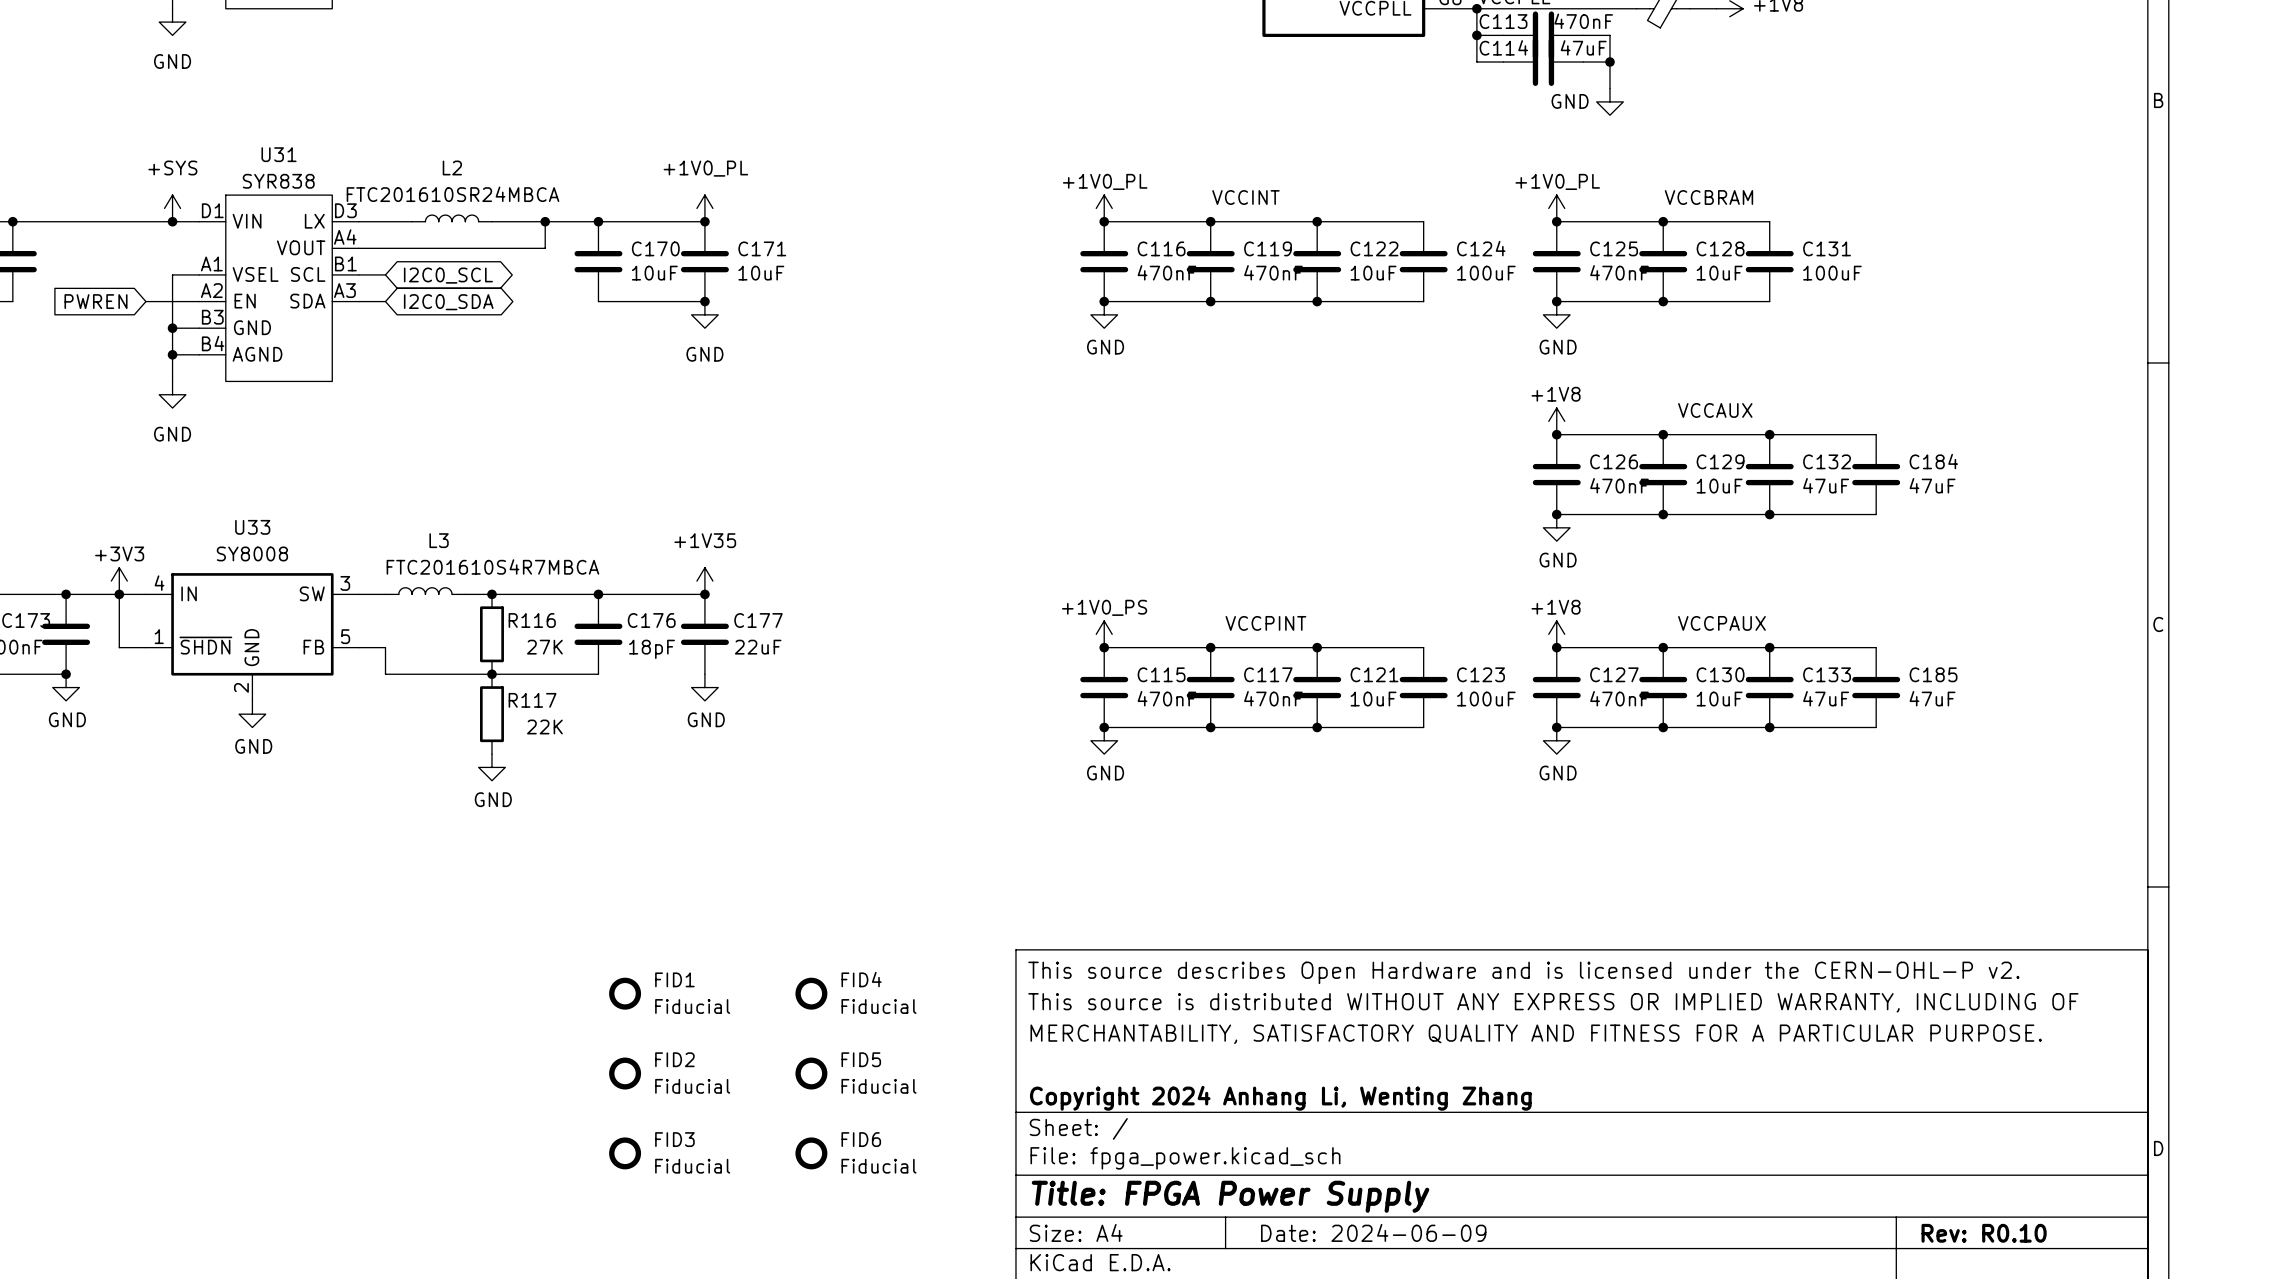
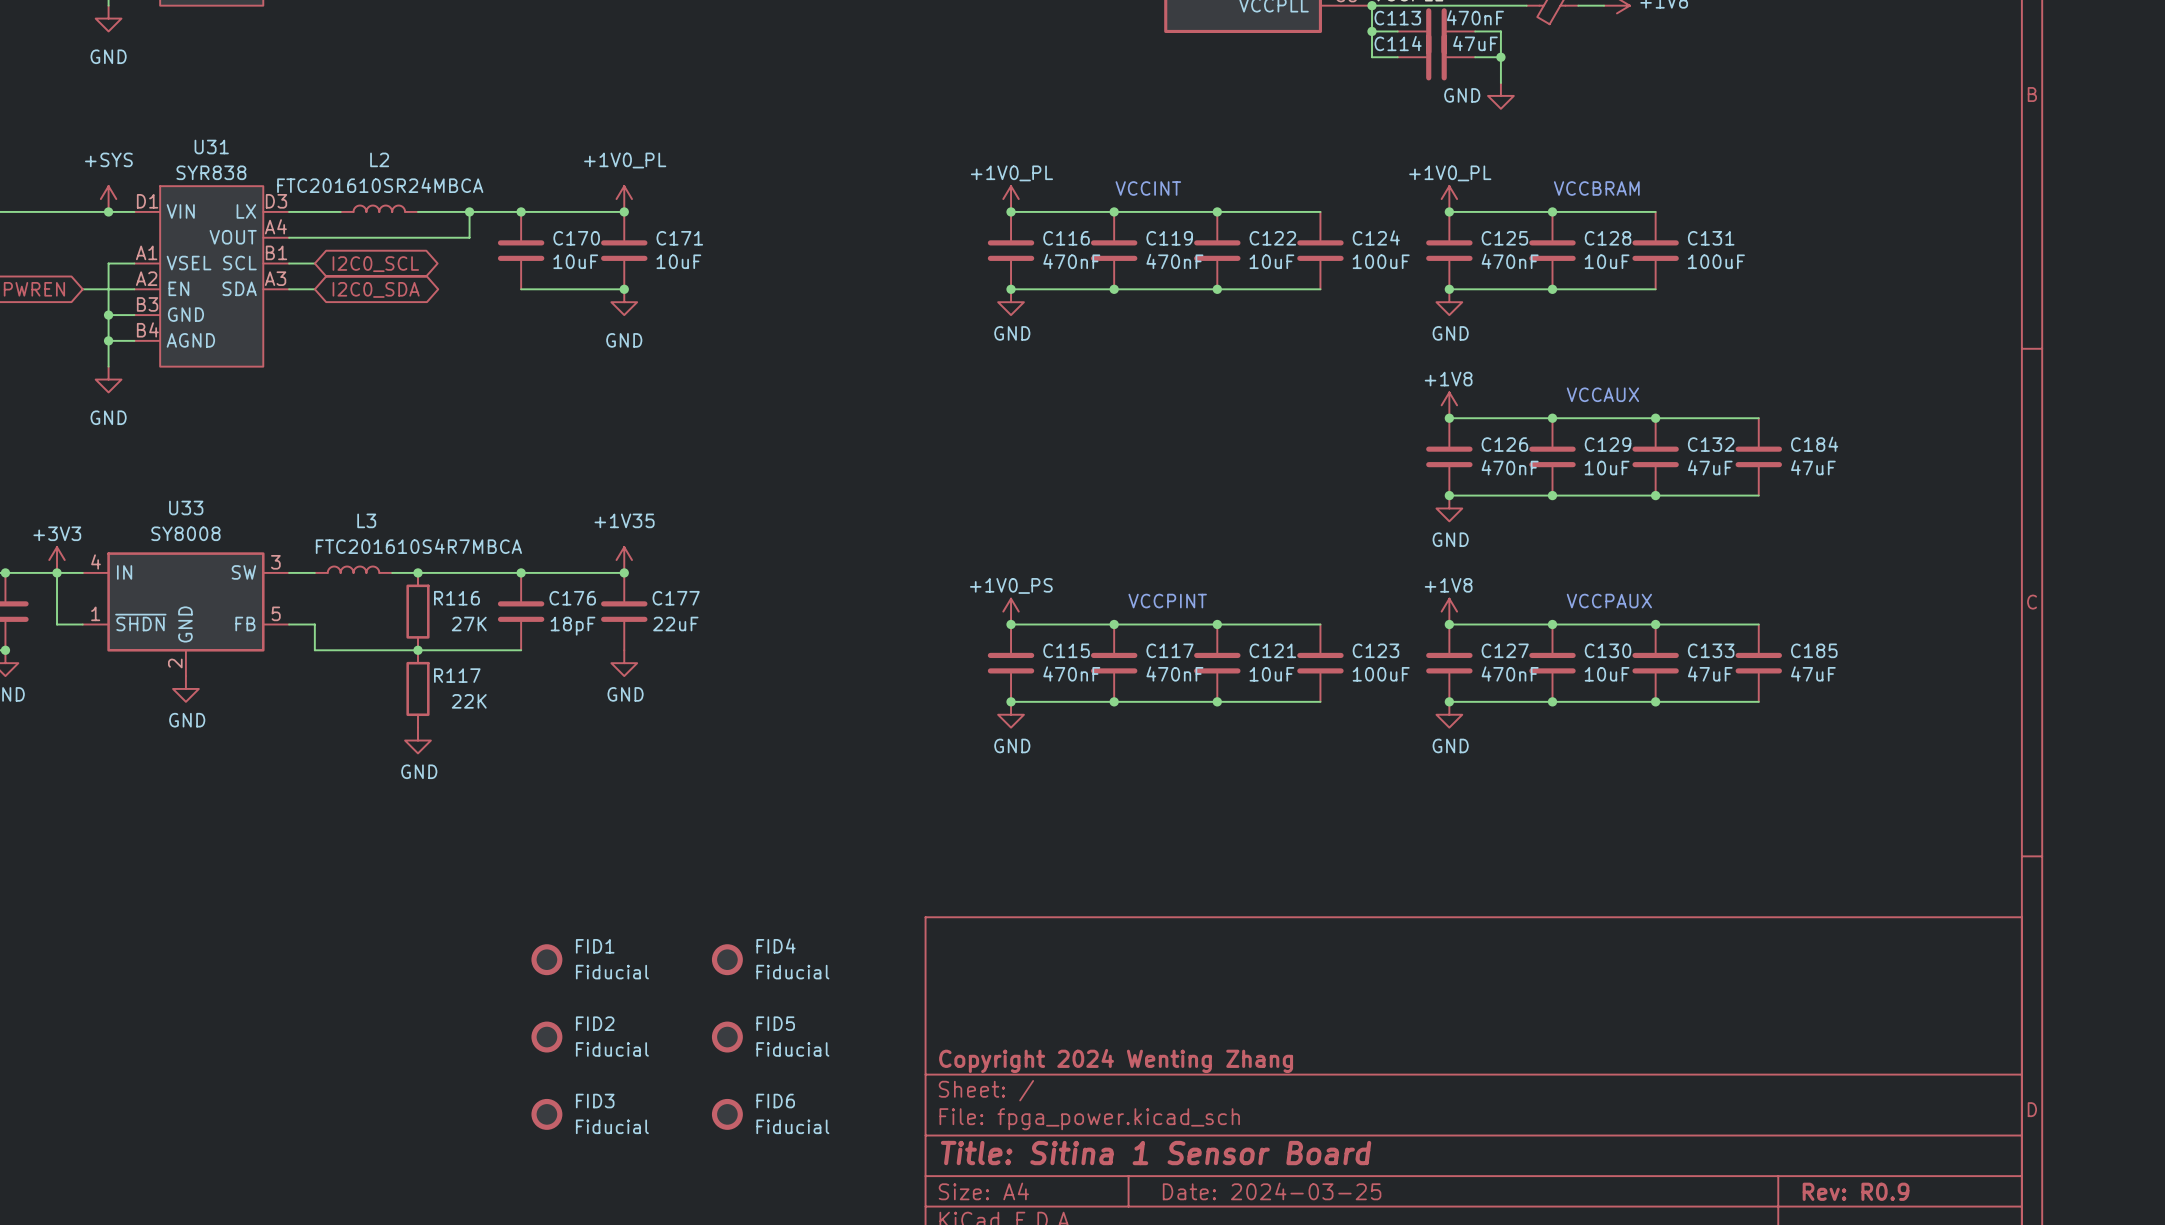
title block: This source describes Open Hardware and is licensed under the CERN-OHL-P v2. (1523, 972) -> none
title block: This source is distributed WITHOUT ANY EXPRESS OR IMPLIED WARRANTY, INCLUDING OF (1553, 1002) -> none
title block: MERCHANTABILITY, SATISFACTORY QUALITY AND FITNESS FOR A PARTICULAR PURPOSE. (1536, 1034) -> none
title block: Copyright 2024 Anhang Li, Wenting Zhang (1280, 1098) -> Copyright 2024 Wenting Zhang (1116, 1060)
title block: Title: FPGA Power Supply (1230, 1196) -> Title: Sitina 1 Sensor Board (1156, 1153)
title block: Date: 2024-06-09 (1373, 1232) -> Date: 2024-03-25 (1272, 1191)
title block: Rev: R0.10 (1984, 1233) -> Rev: R0.9 (1856, 1191)

